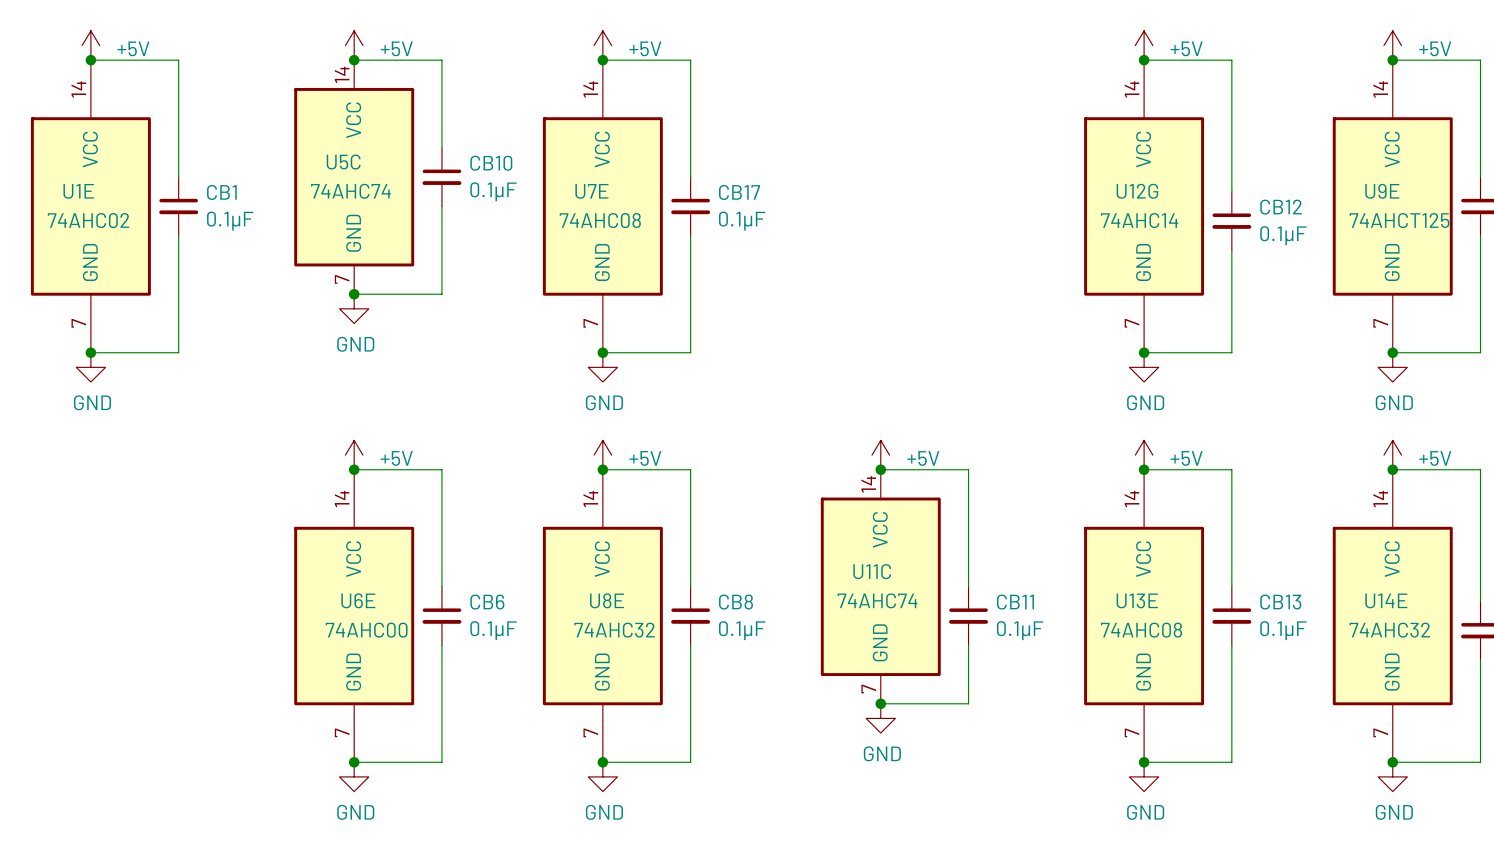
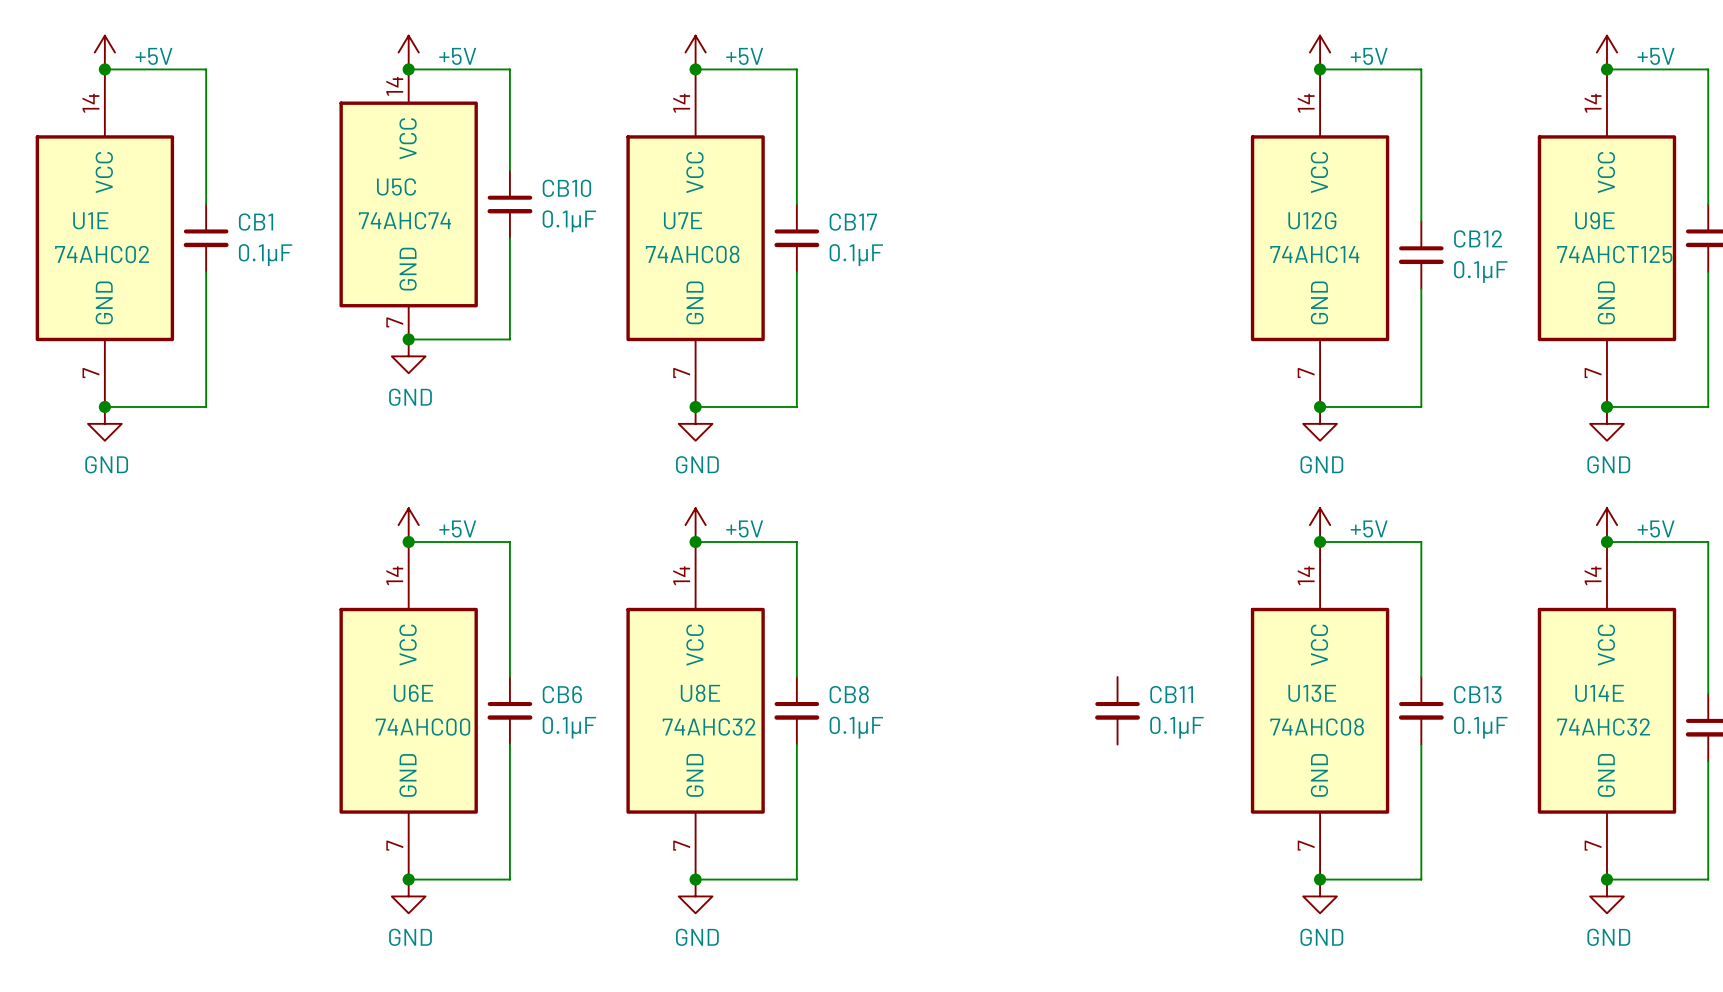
power symbol: +5V (880, 455) -> none
wire: (880, 469) (968, 469) (968, 586) -> none
junction: (880, 469) -> none
U11C: 74AHC74 (880, 586) -> none
wire: (968, 645) (968, 703) (880, 703) -> none
junction: (880, 703) -> none
power symbol: GND (880, 718) -> none

